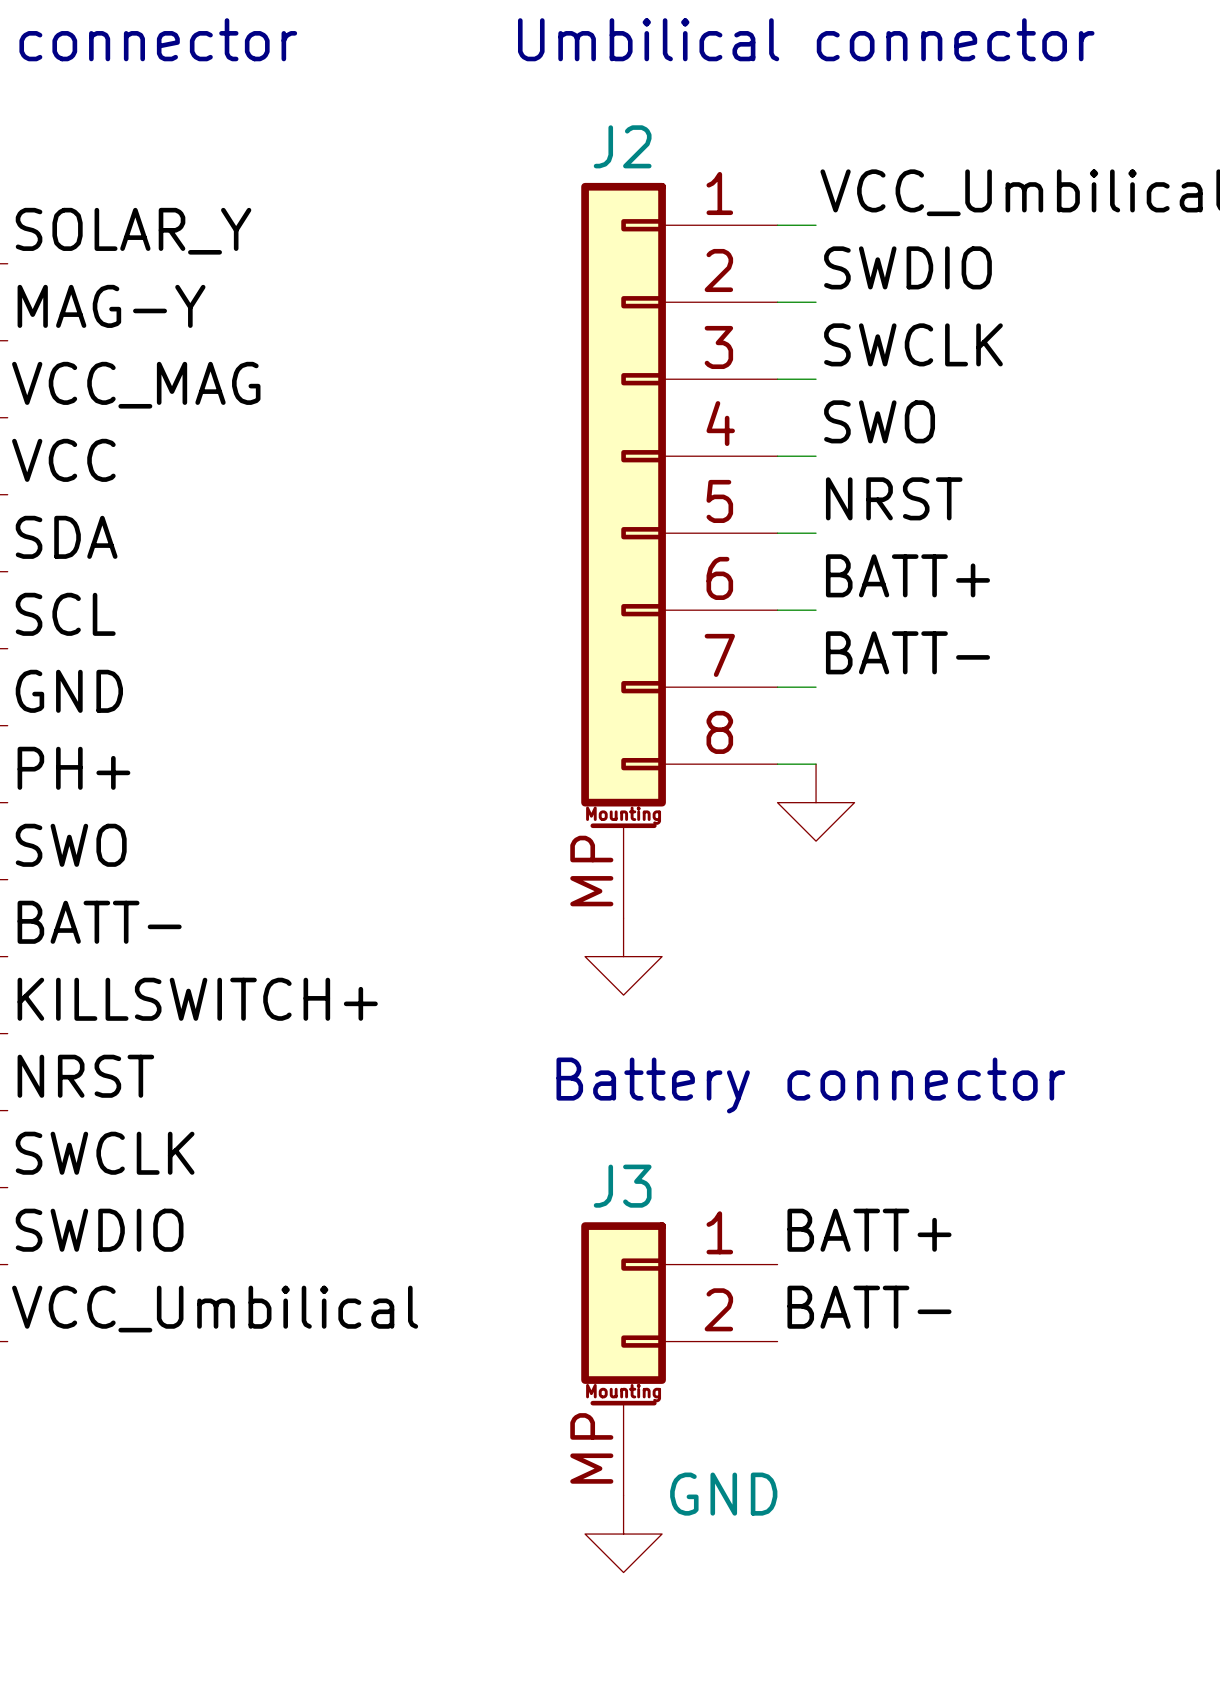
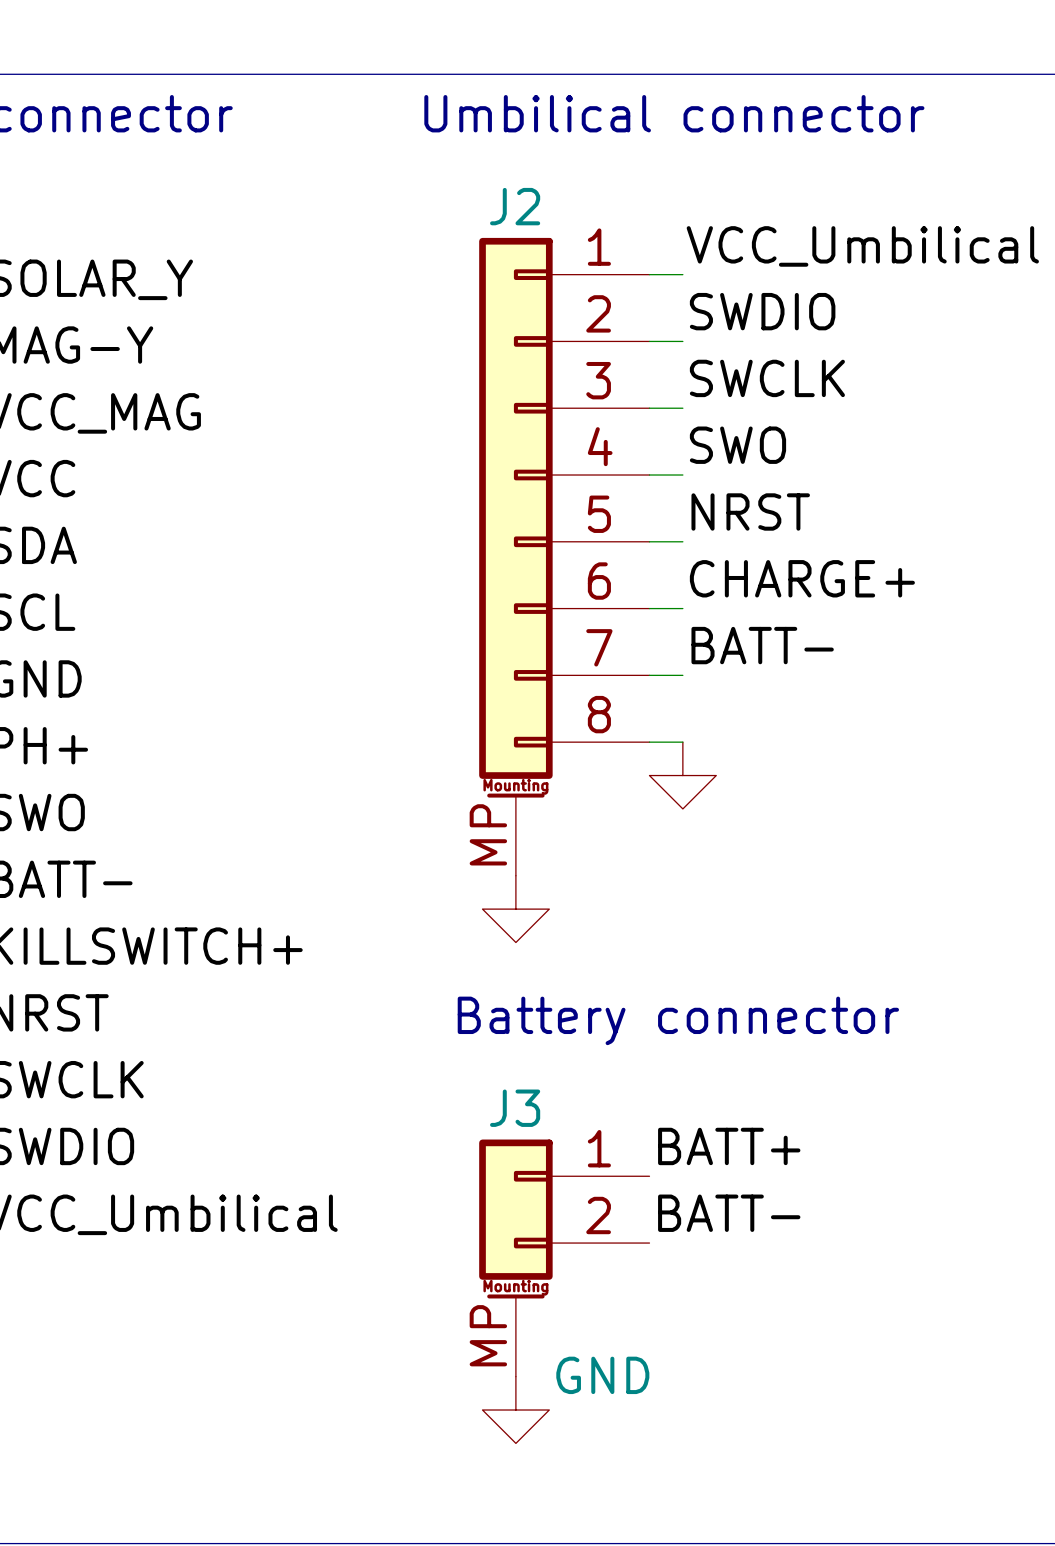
label: BATT+ (907, 575) -> CHARGE+ (802, 578)

